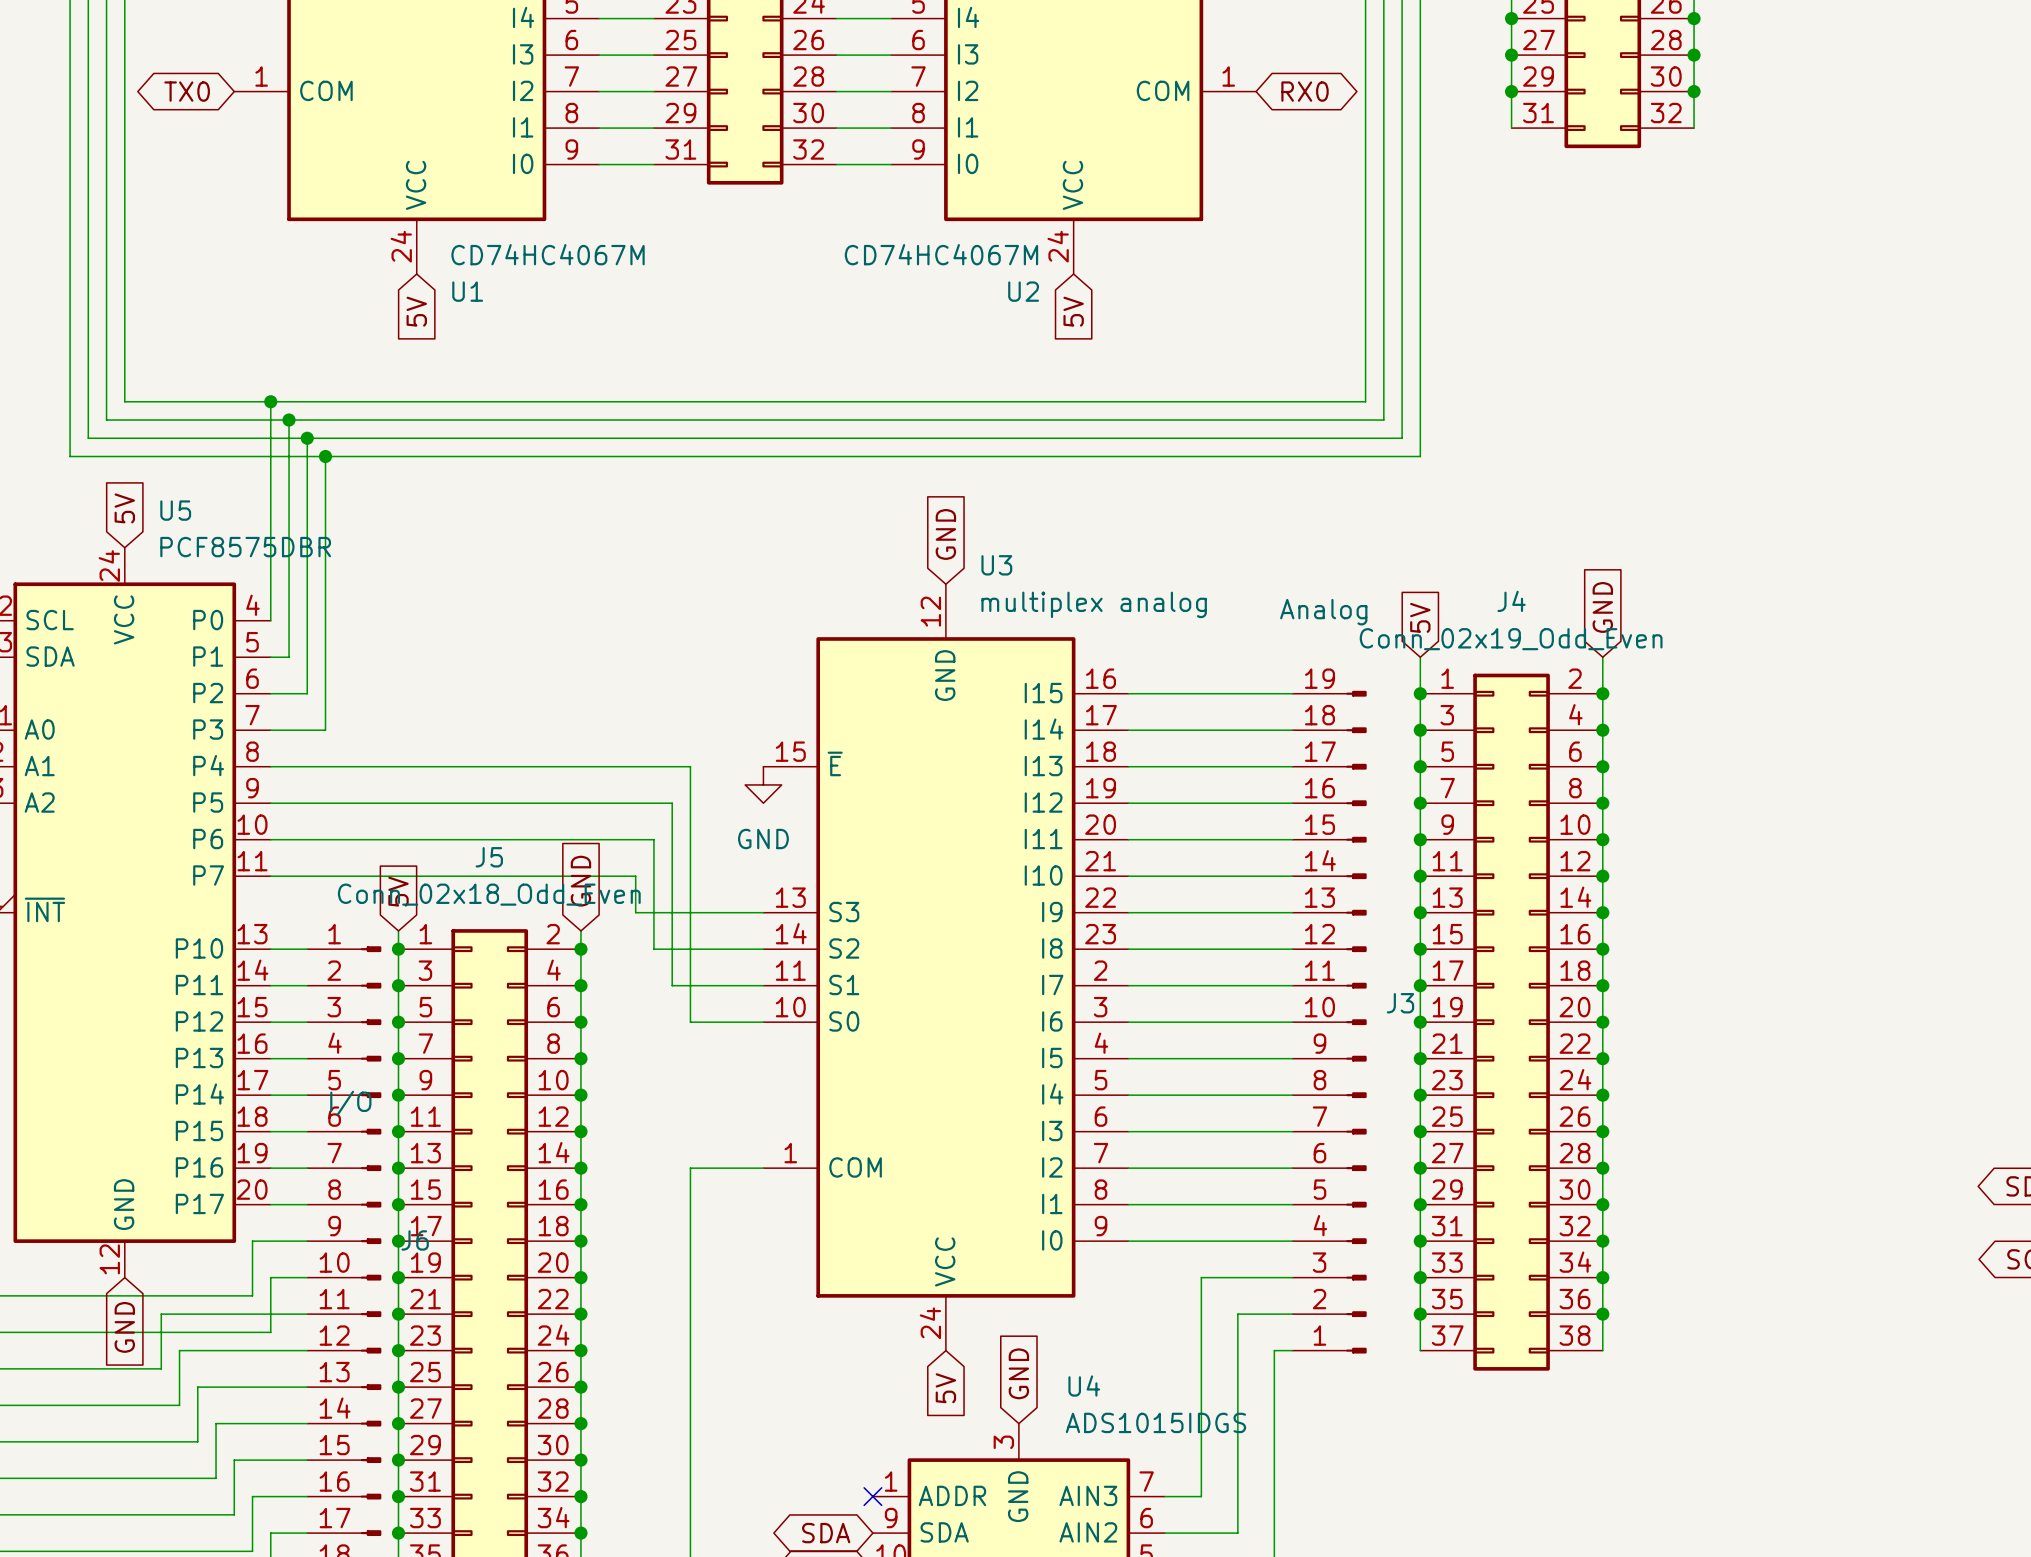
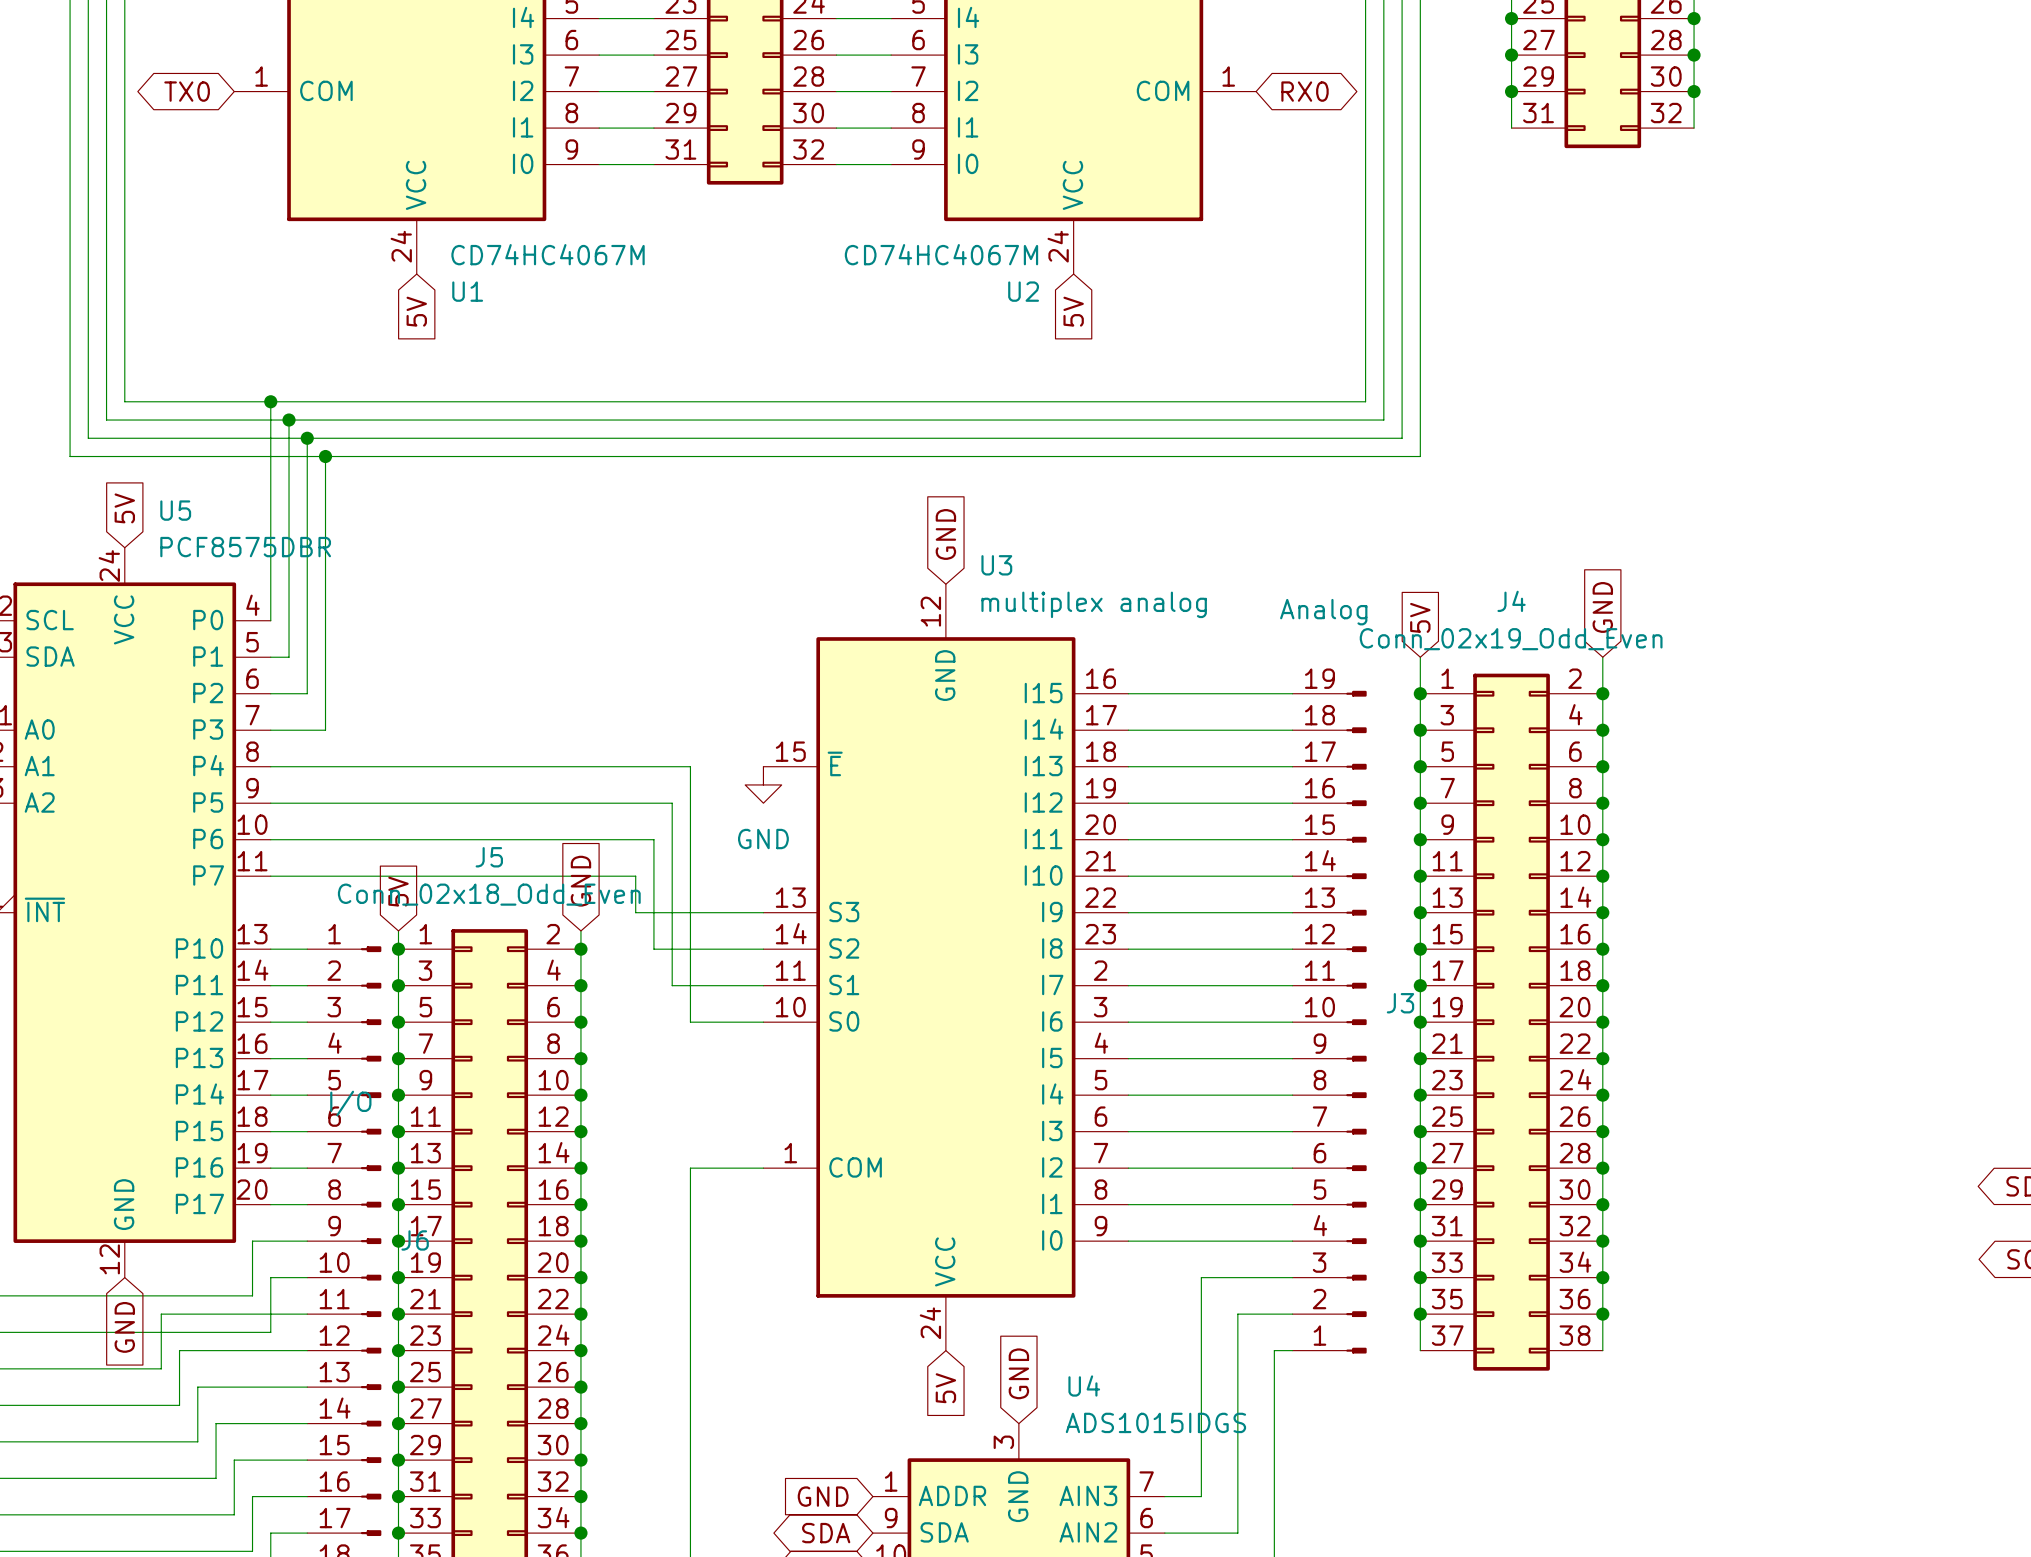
global label: none -> GND (823, 1496)
no-connect mark: (872, 1496) -> none

